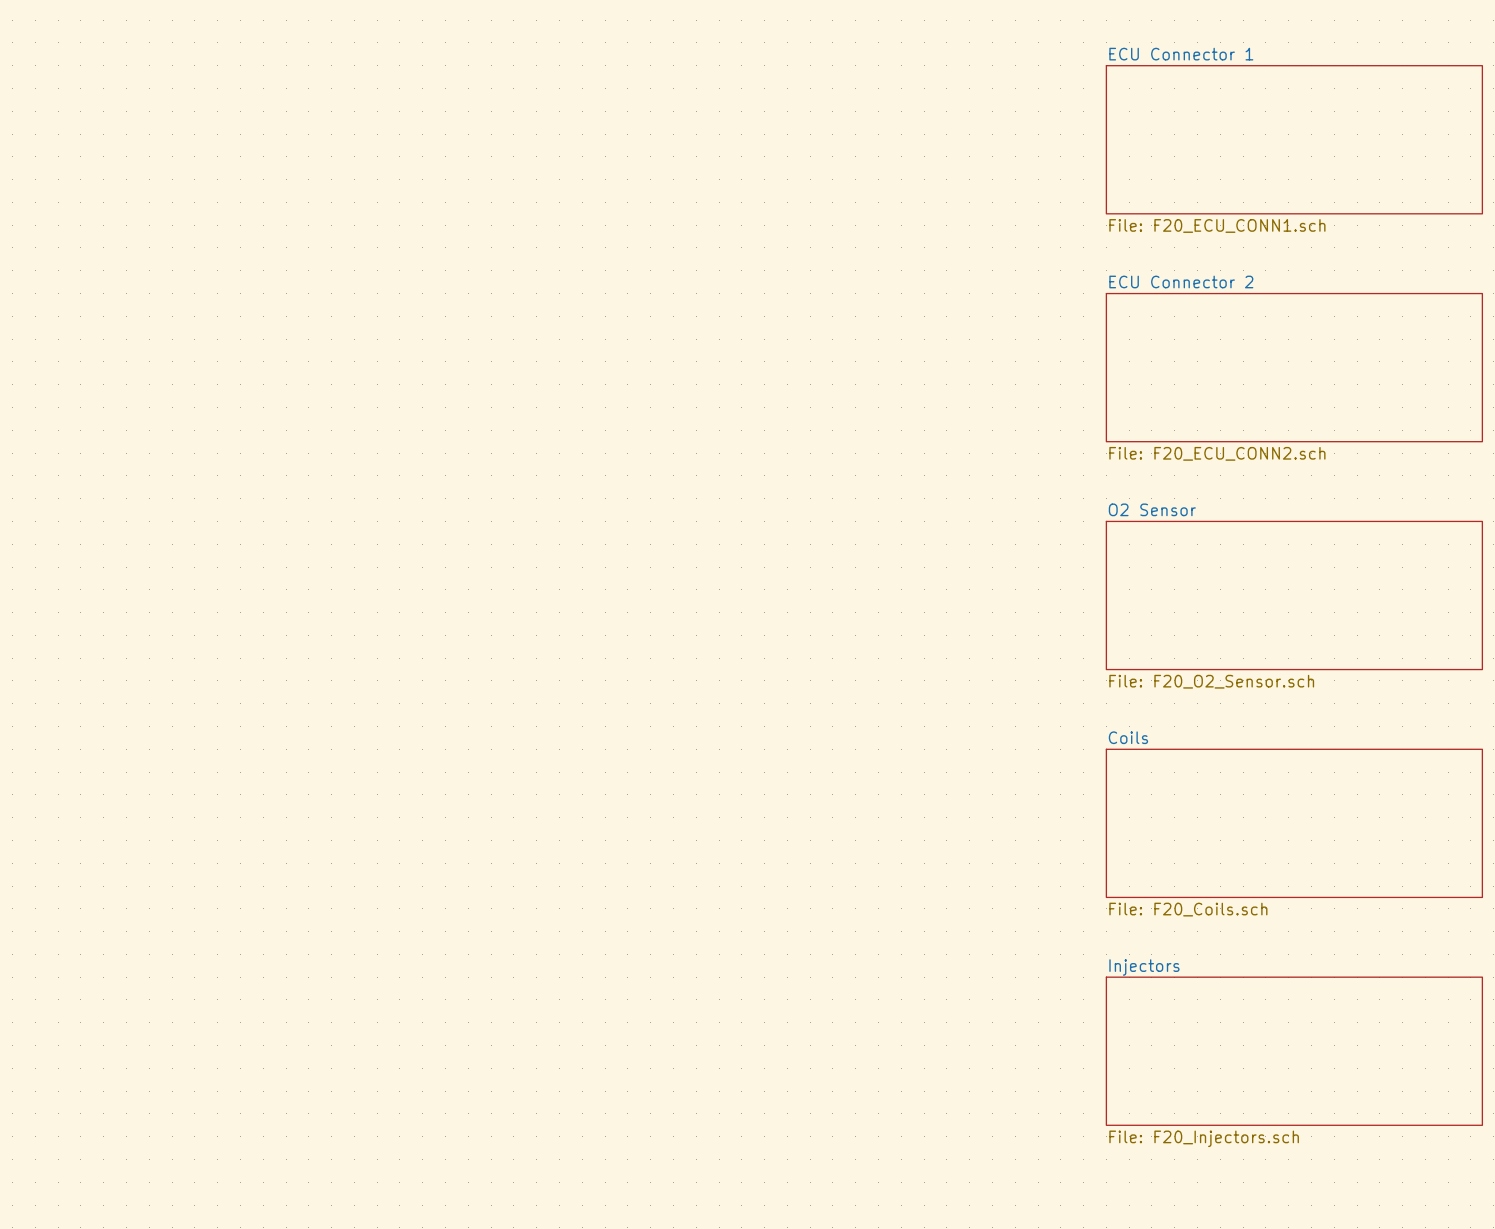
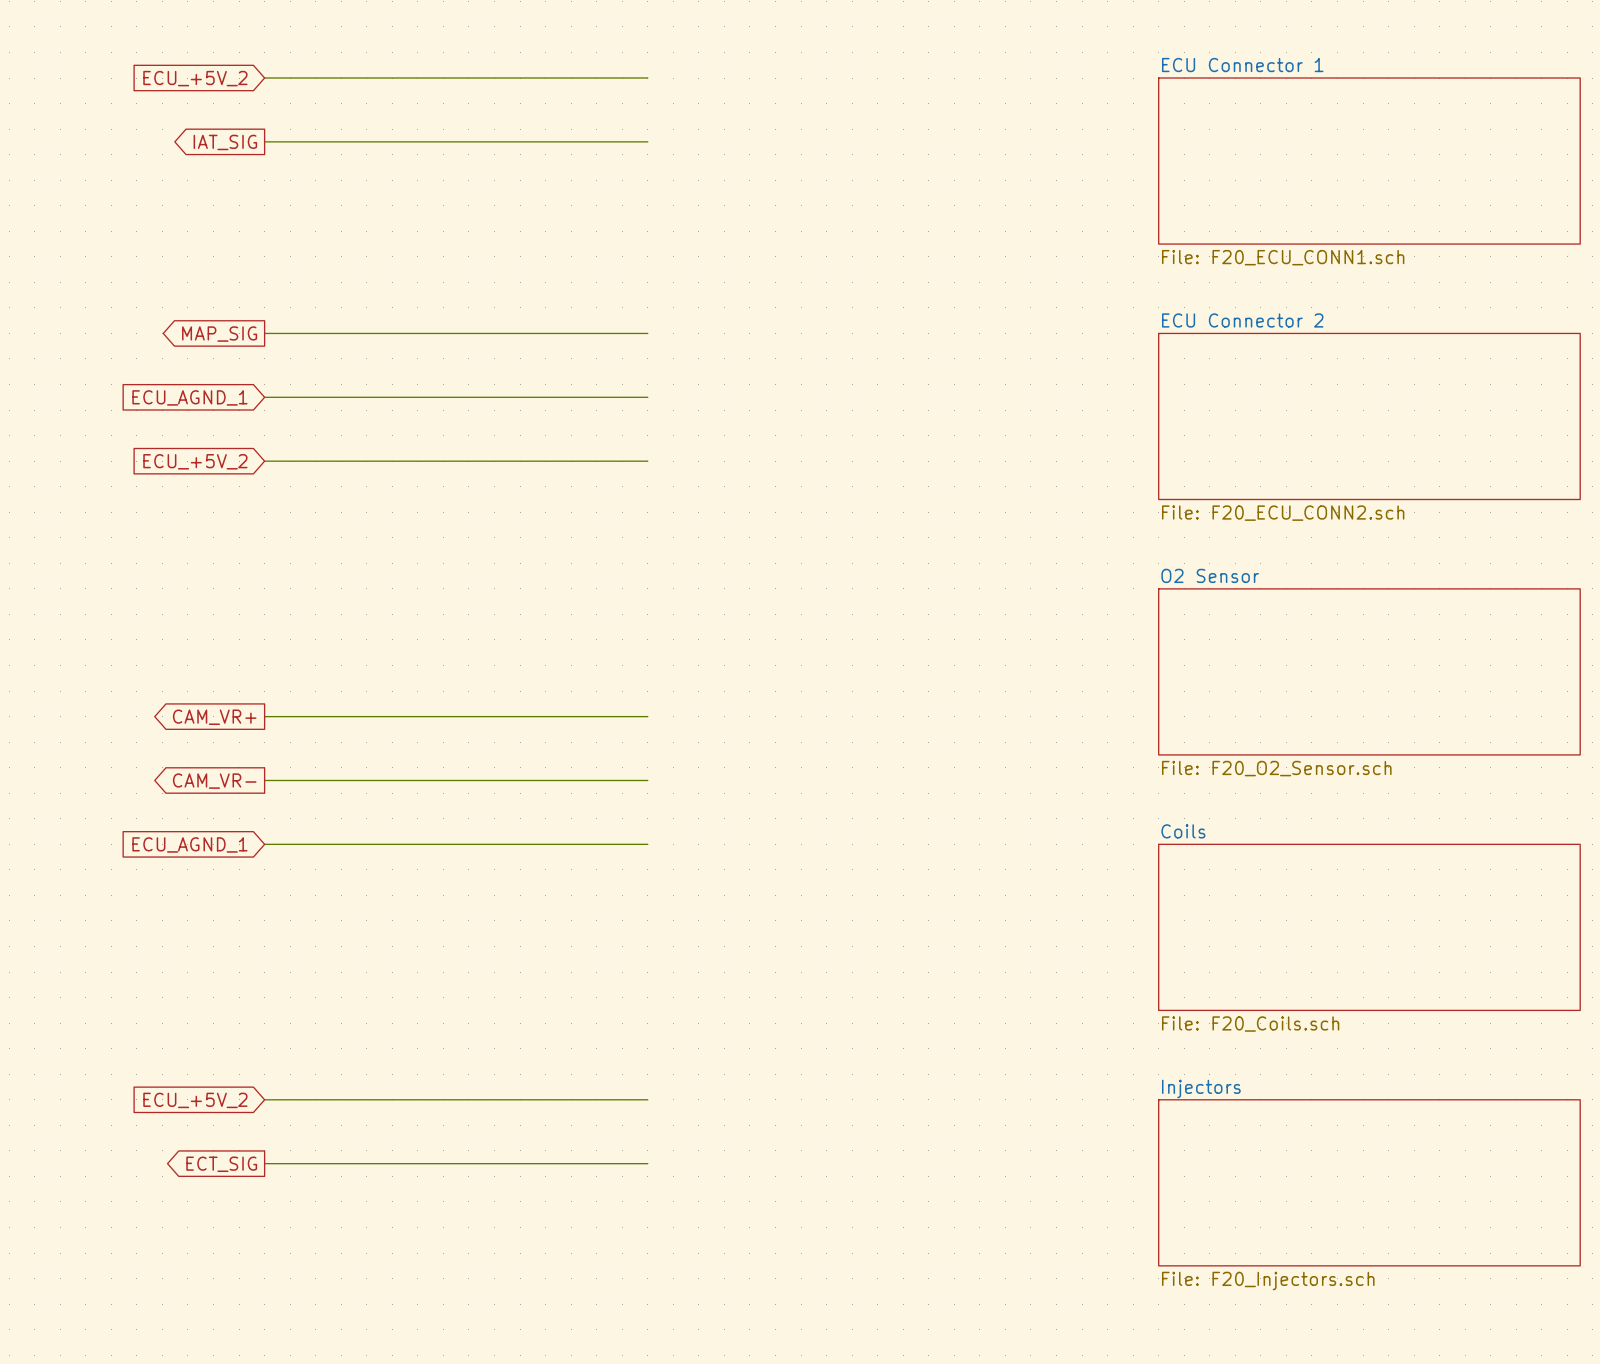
wire: none -> (264, 78) (647, 78)
global label: none -> ECU_+5V_2 (195, 78)
wire: none -> (264, 141) (647, 141)
global label: none -> IAT_SIG (225, 142)
wire: none -> (264, 333) (647, 333)
global label: none -> MAP_SIG (219, 334)
wire: none -> (264, 397) (647, 397)
global label: none -> ECU_AGND_1 (189, 397)
wire: none -> (264, 461) (647, 461)
global label: none -> ECU_+5V_2 (195, 461)
global label: none -> CAM_VR+ (214, 717)
wire: none -> (264, 716) (647, 716)
global label: none -> CAM_VR- (214, 781)
wire: none -> (264, 780) (647, 780)
global label: none -> ECU_AGND_1 (189, 844)
wire: none -> (264, 844) (647, 844)
global label: none -> ECU_+5V_2 (195, 1100)
wire: none -> (264, 1099) (647, 1099)
global label: none -> ECT_SIG (221, 1164)
wire: none -> (264, 1163) (647, 1163)

